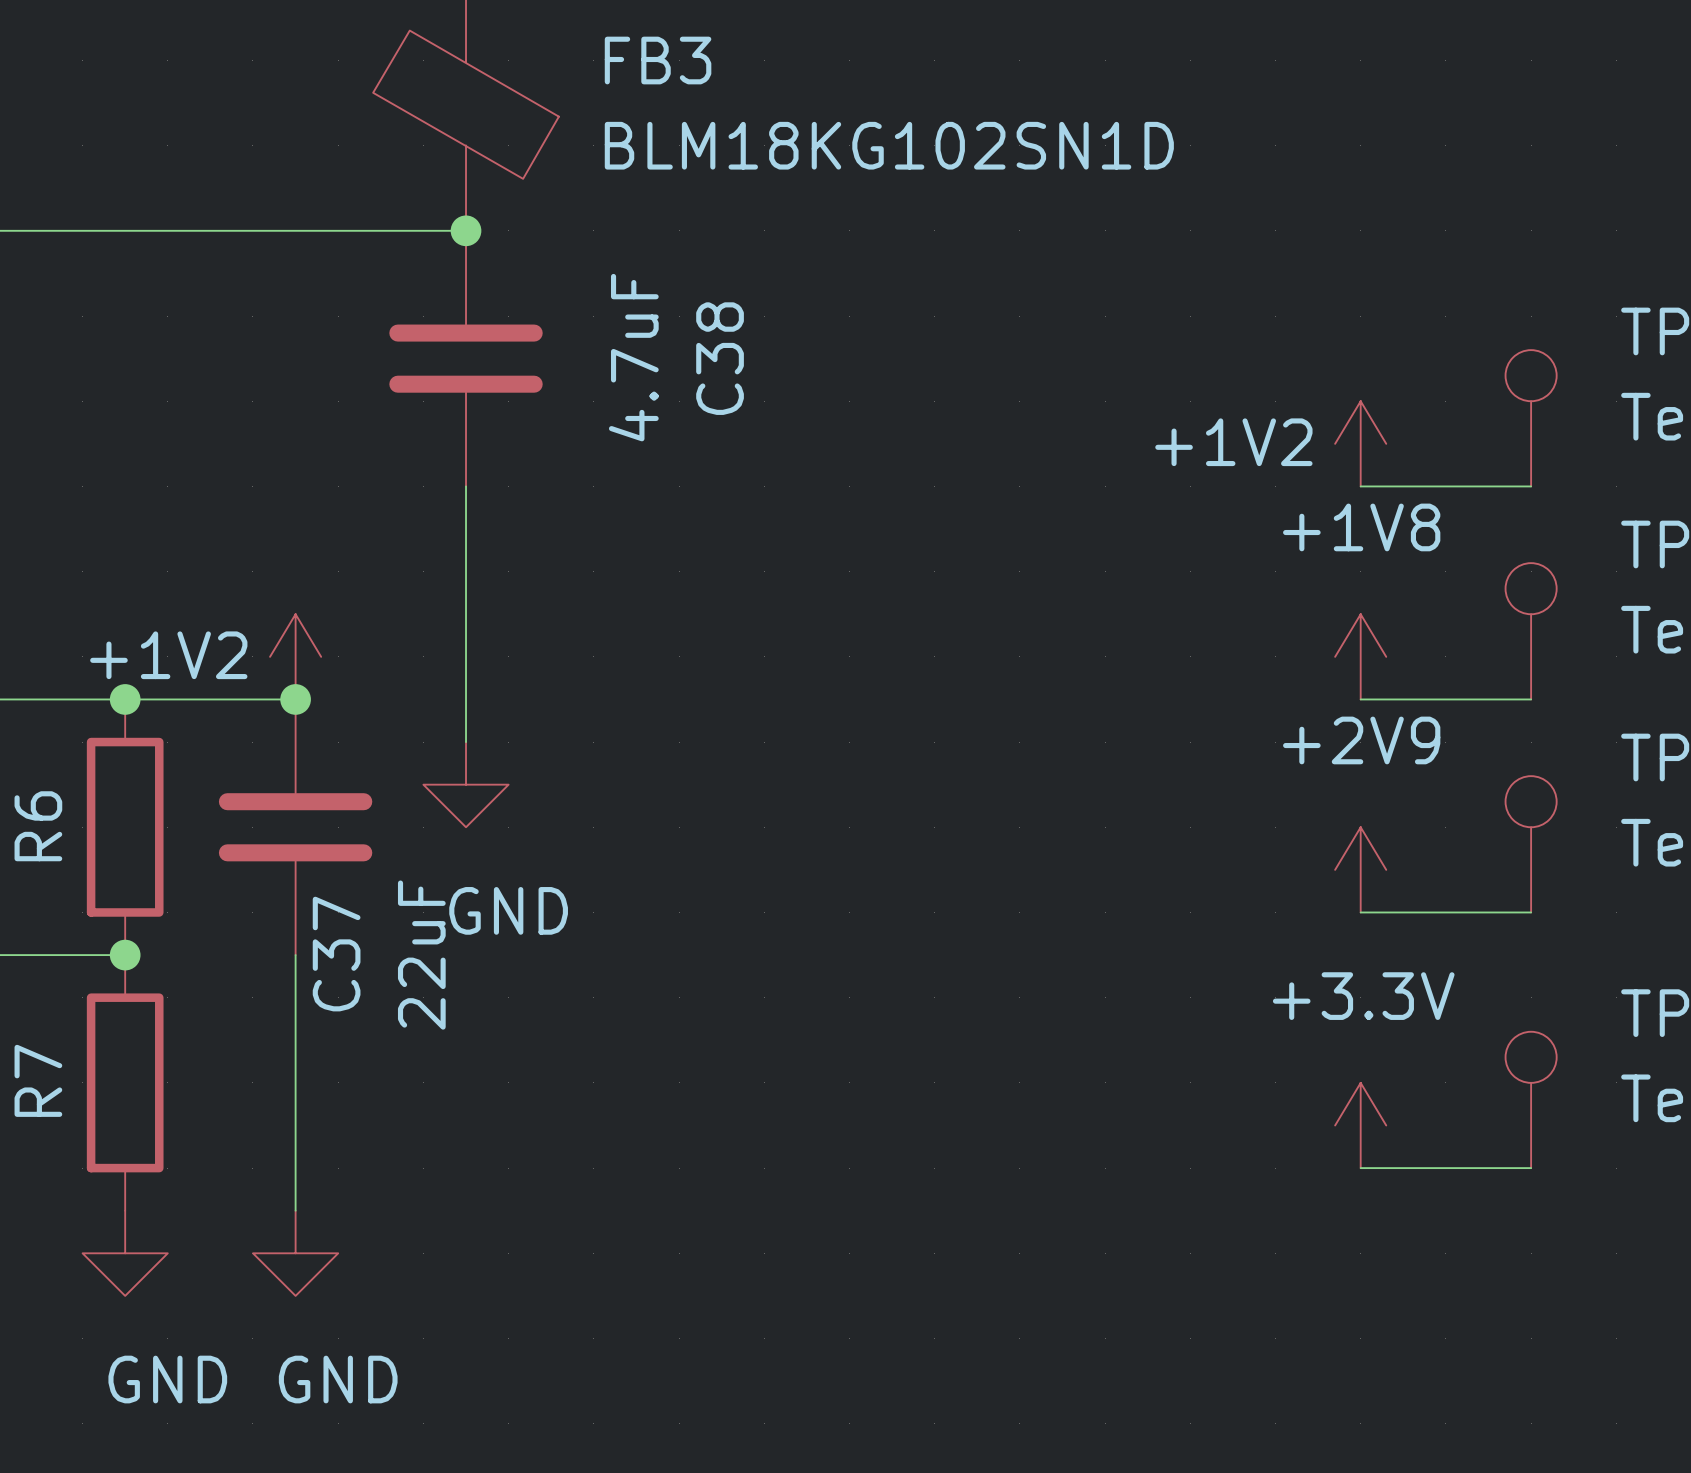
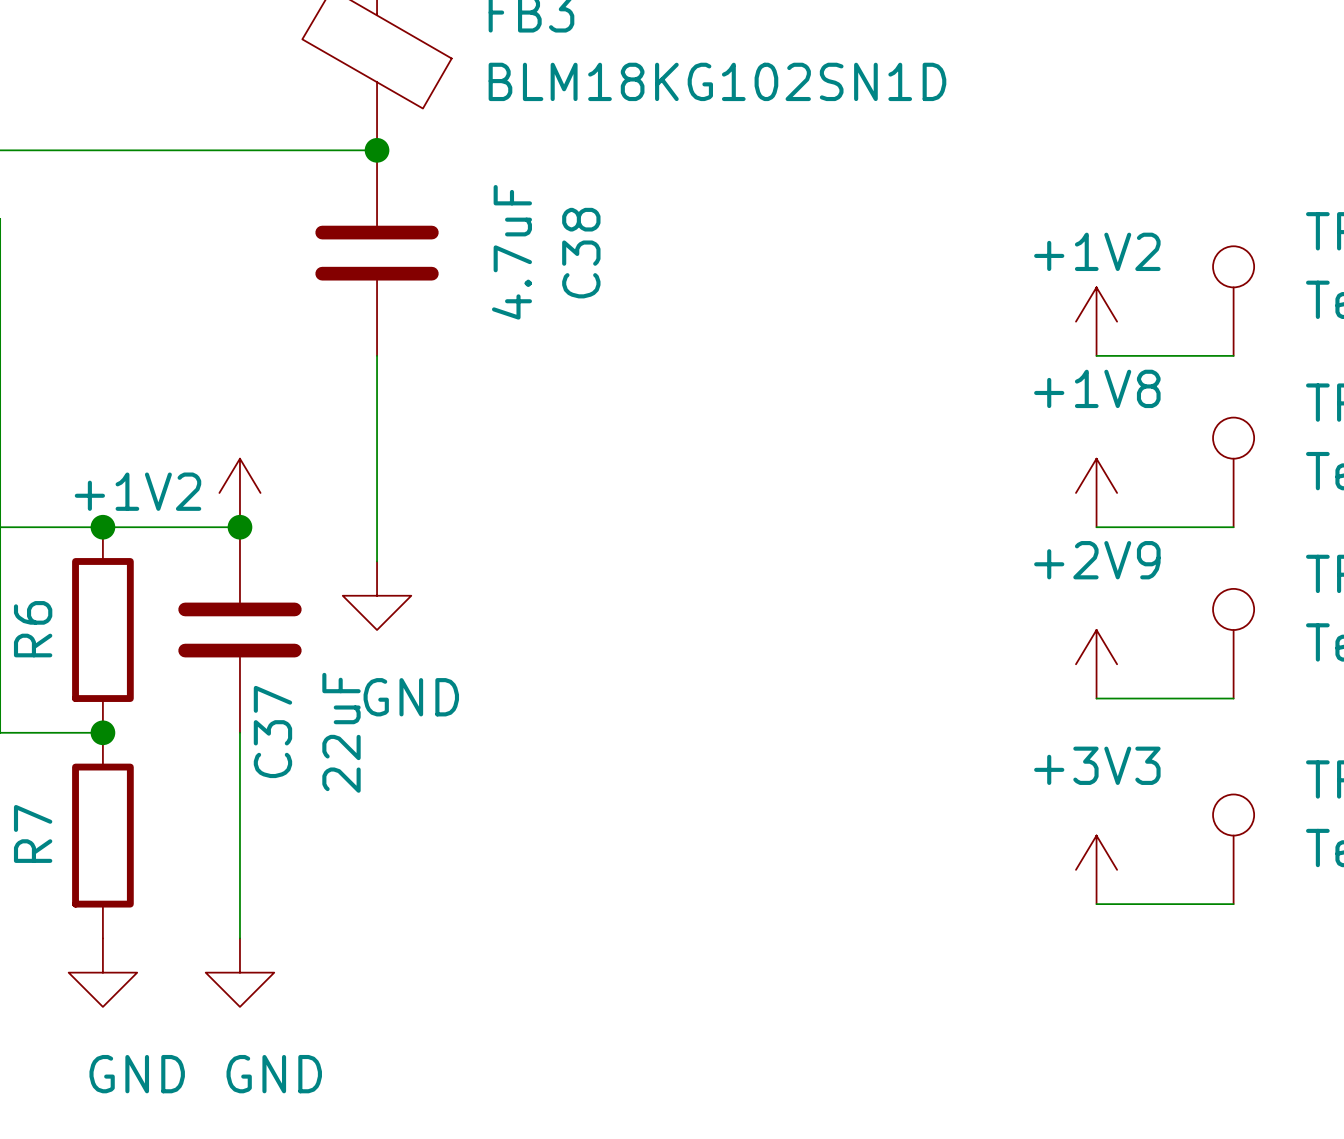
power symbol text position: +1V2 (1233, 442) -> +1V2 (1097, 251)
power symbol: +3.3V (1360, 1125) -> +3V3 (1096, 869)

